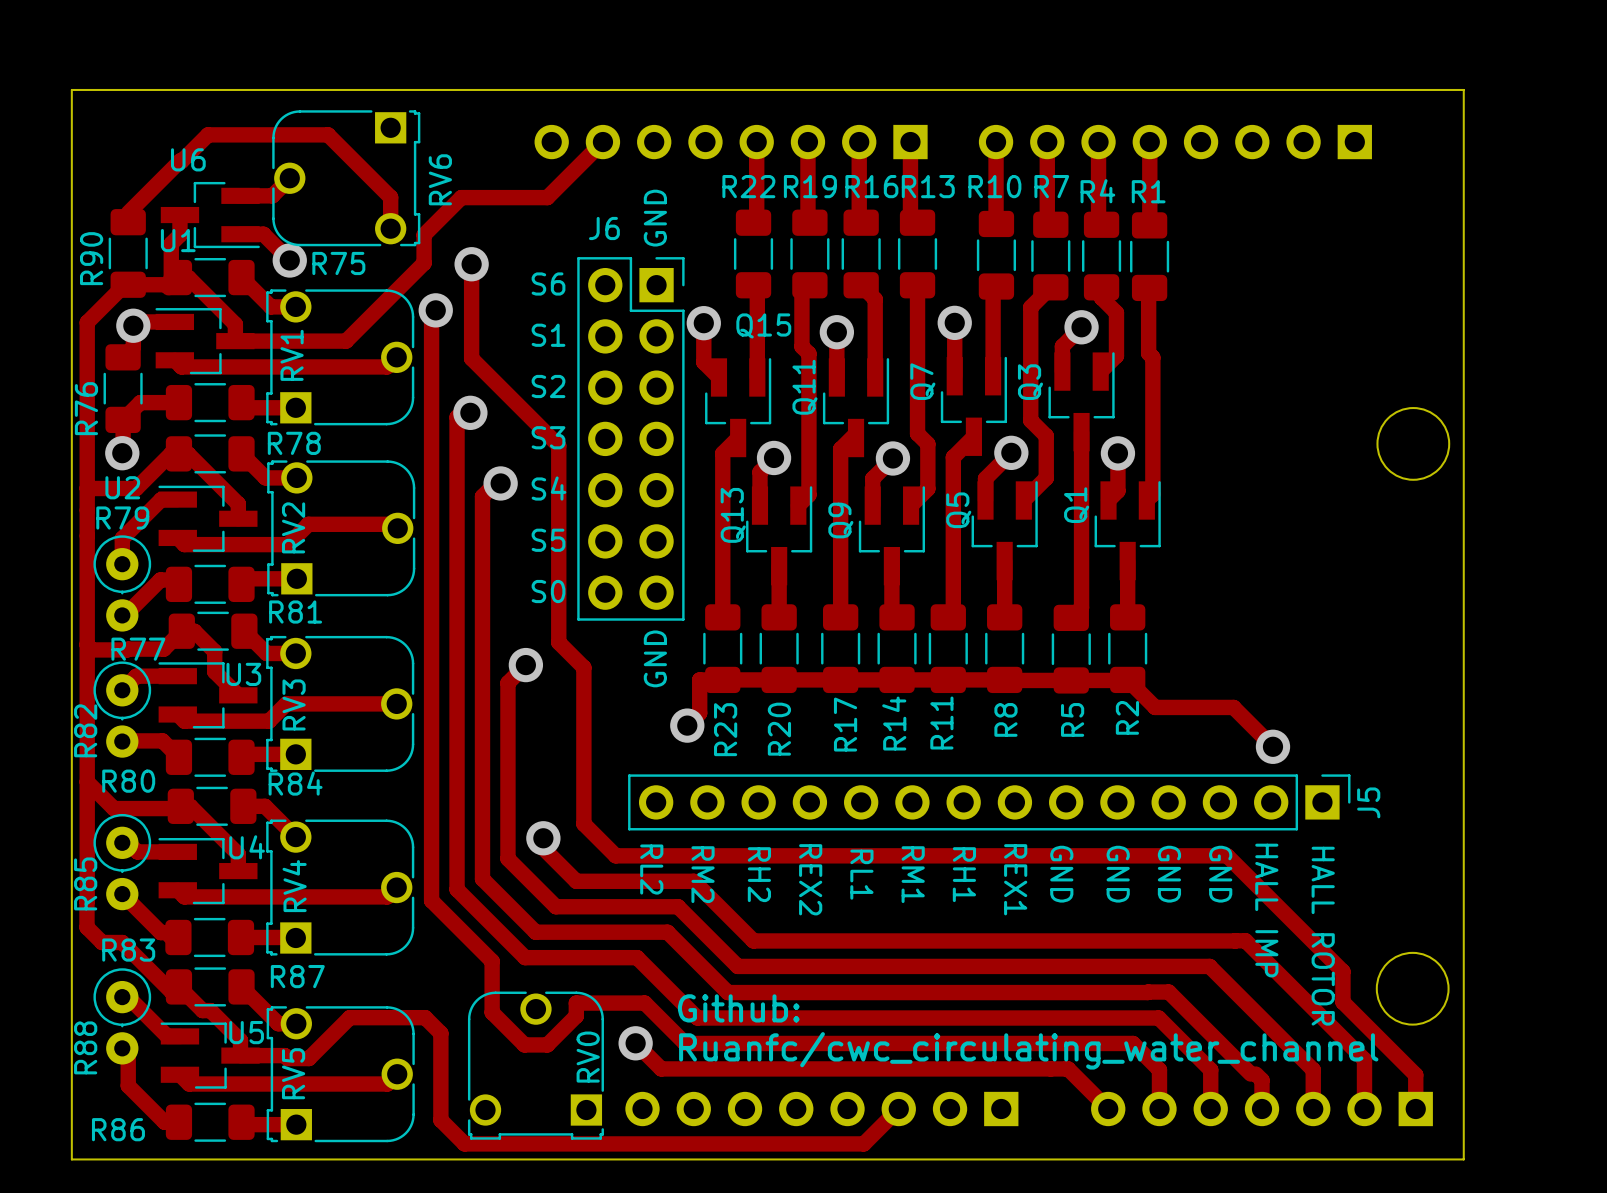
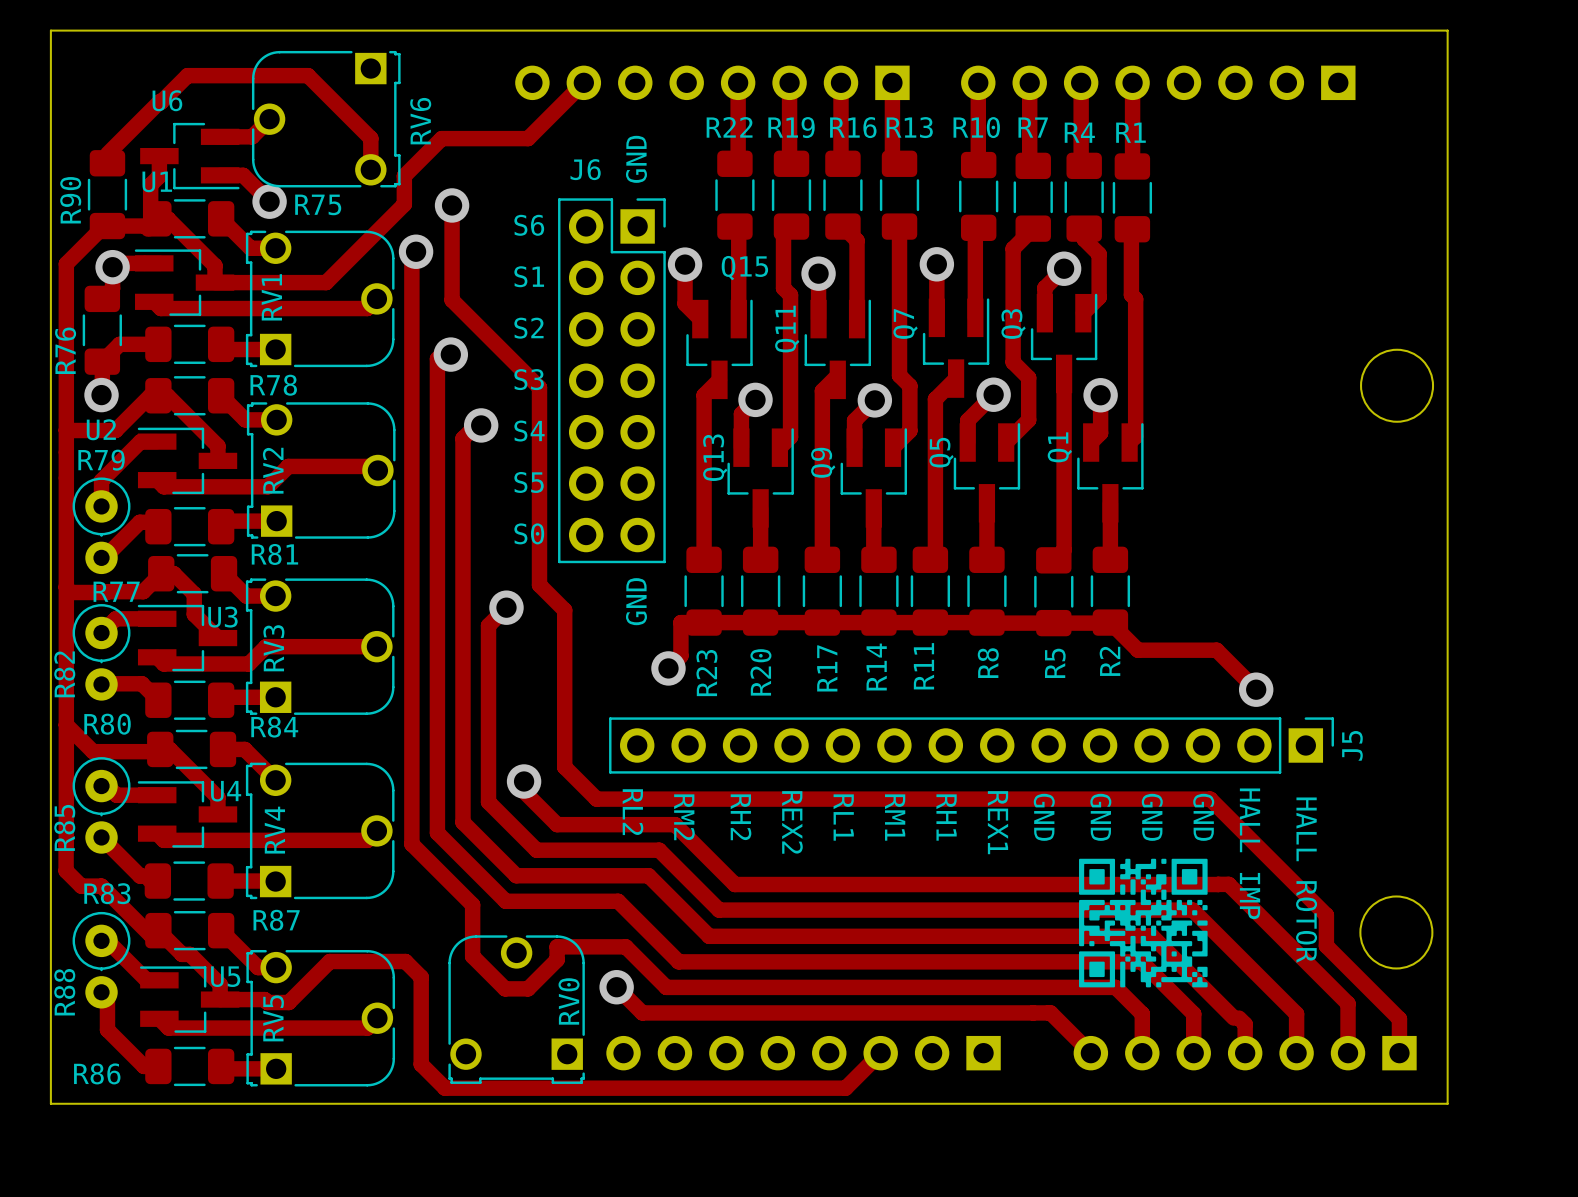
drawing: none -> [1079, 858, 1208, 988]
text: Github: (738, 1008) -> none
text: Ruanfc/cwc_circulating_water_channel (1028, 1050) -> none

